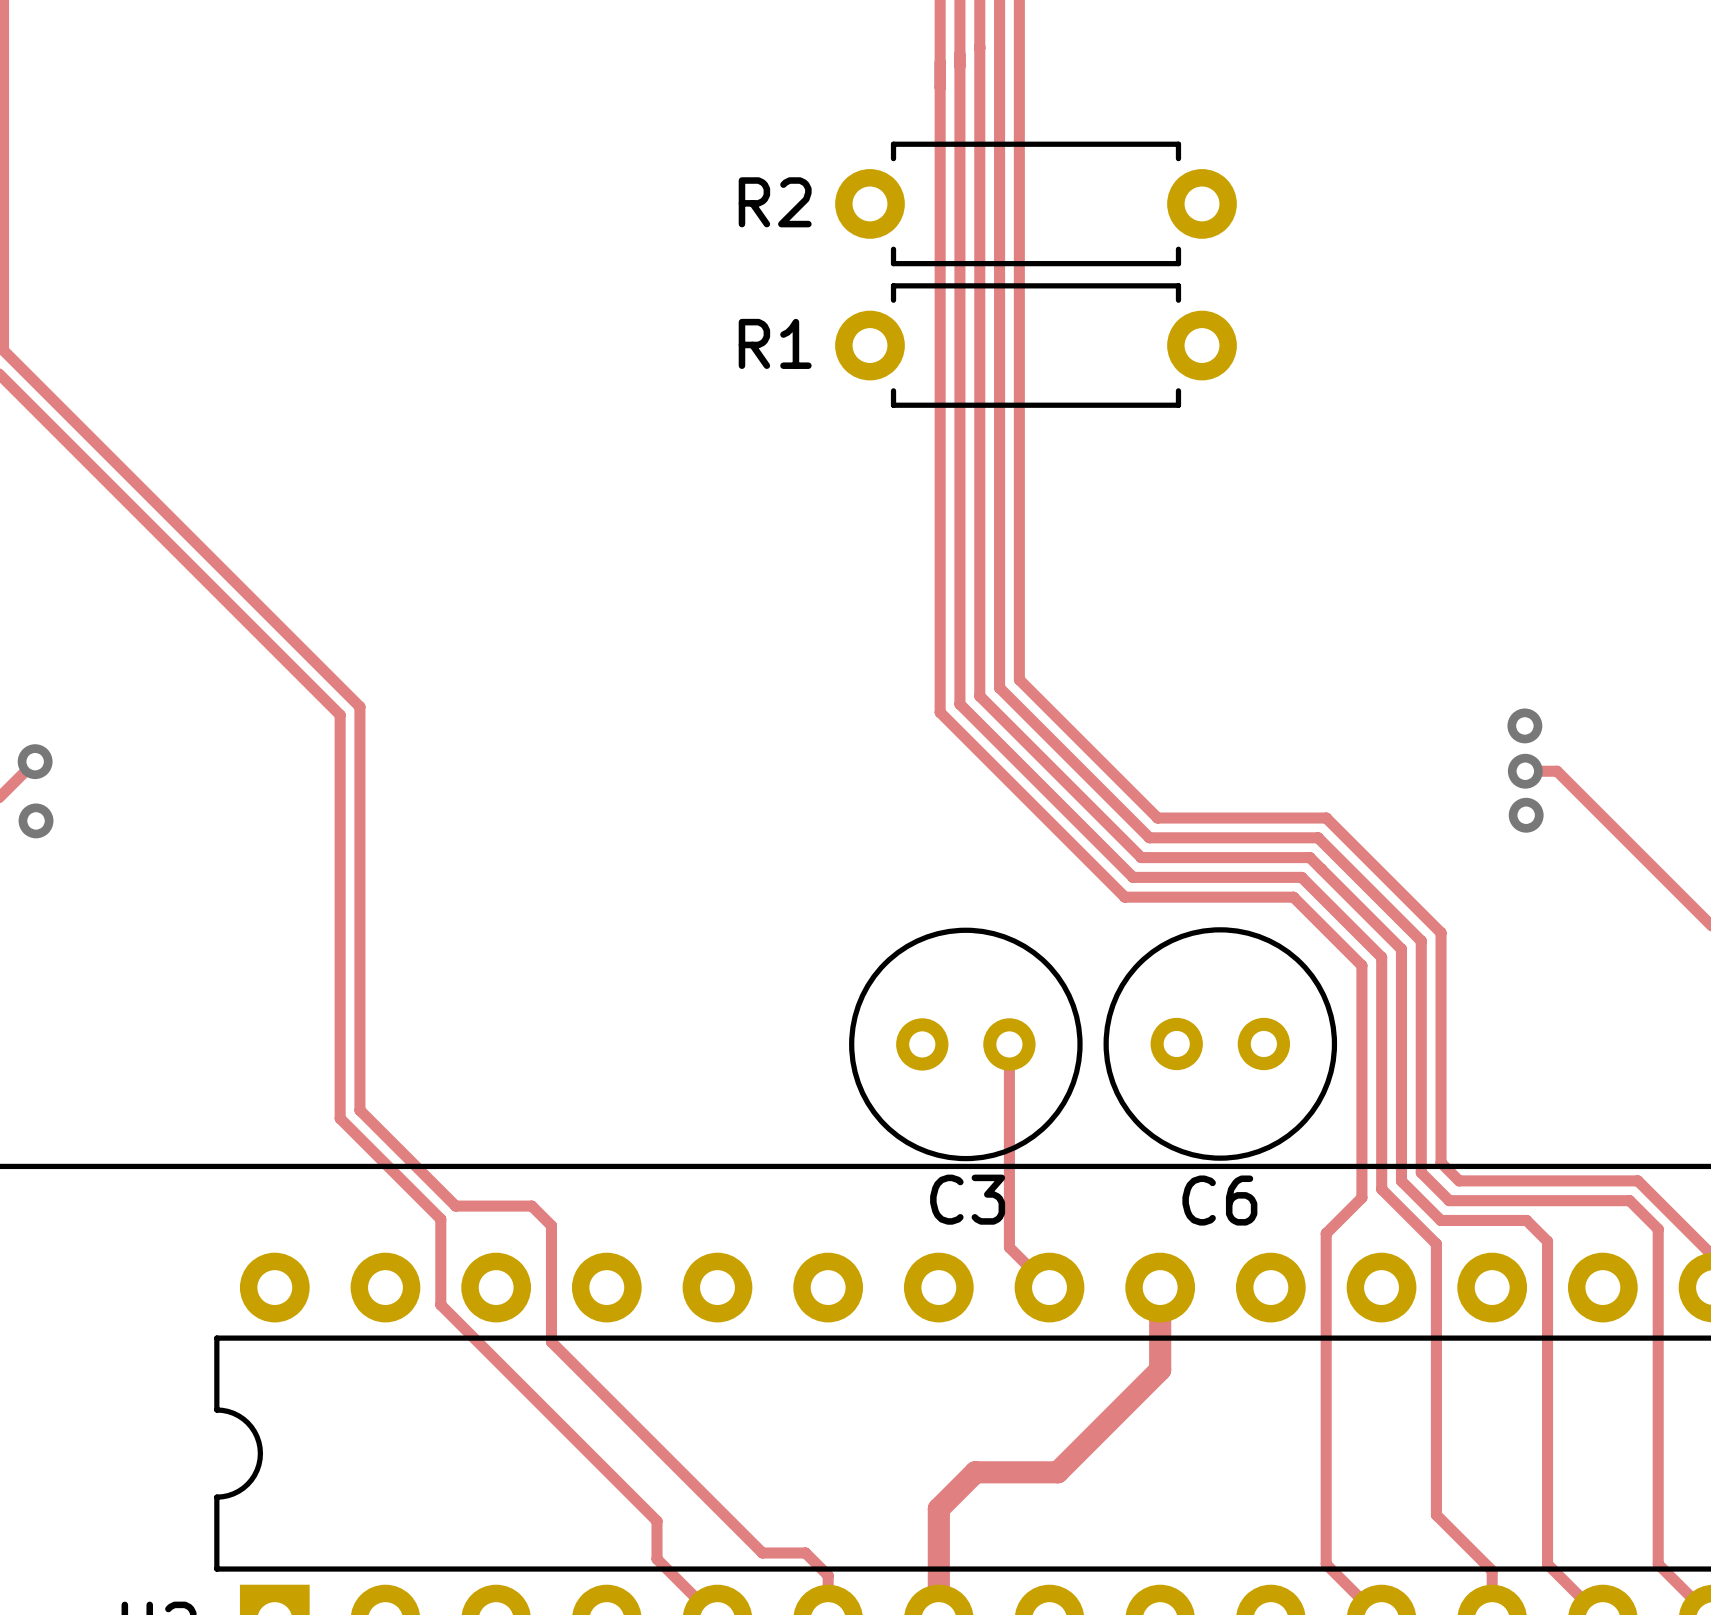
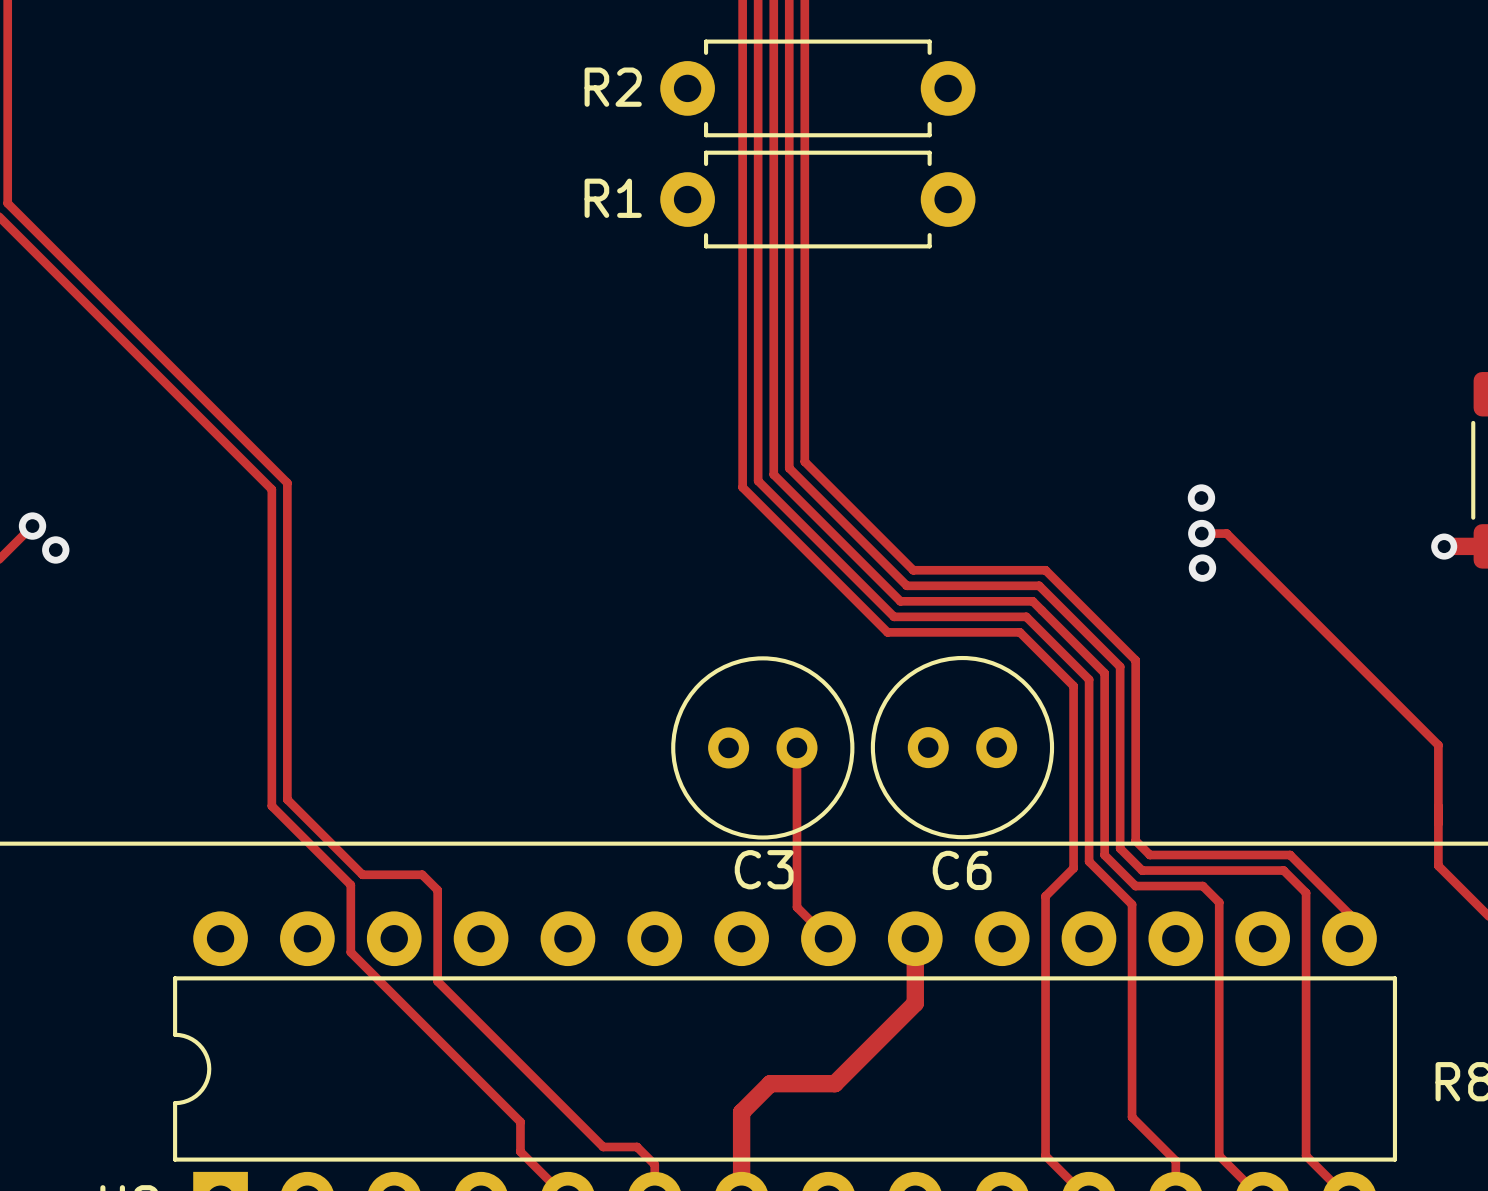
via position: (36, 820) -> (55, 549)

